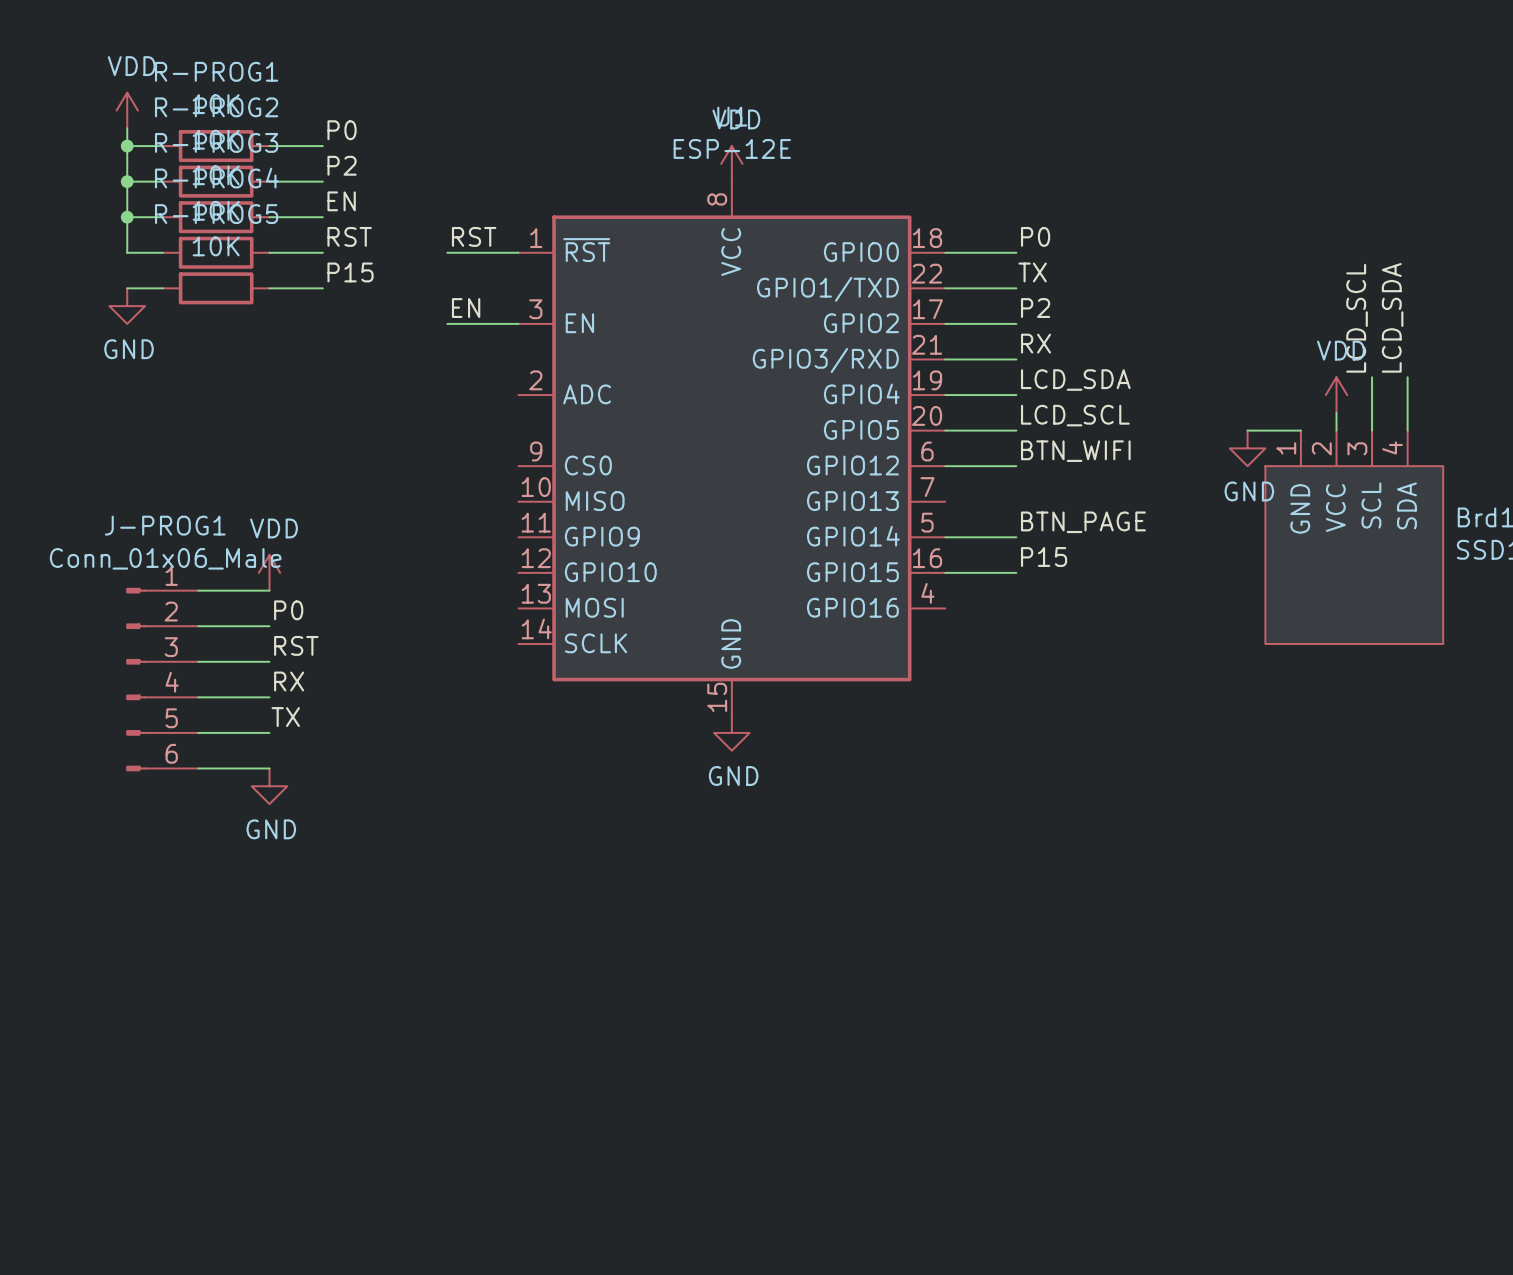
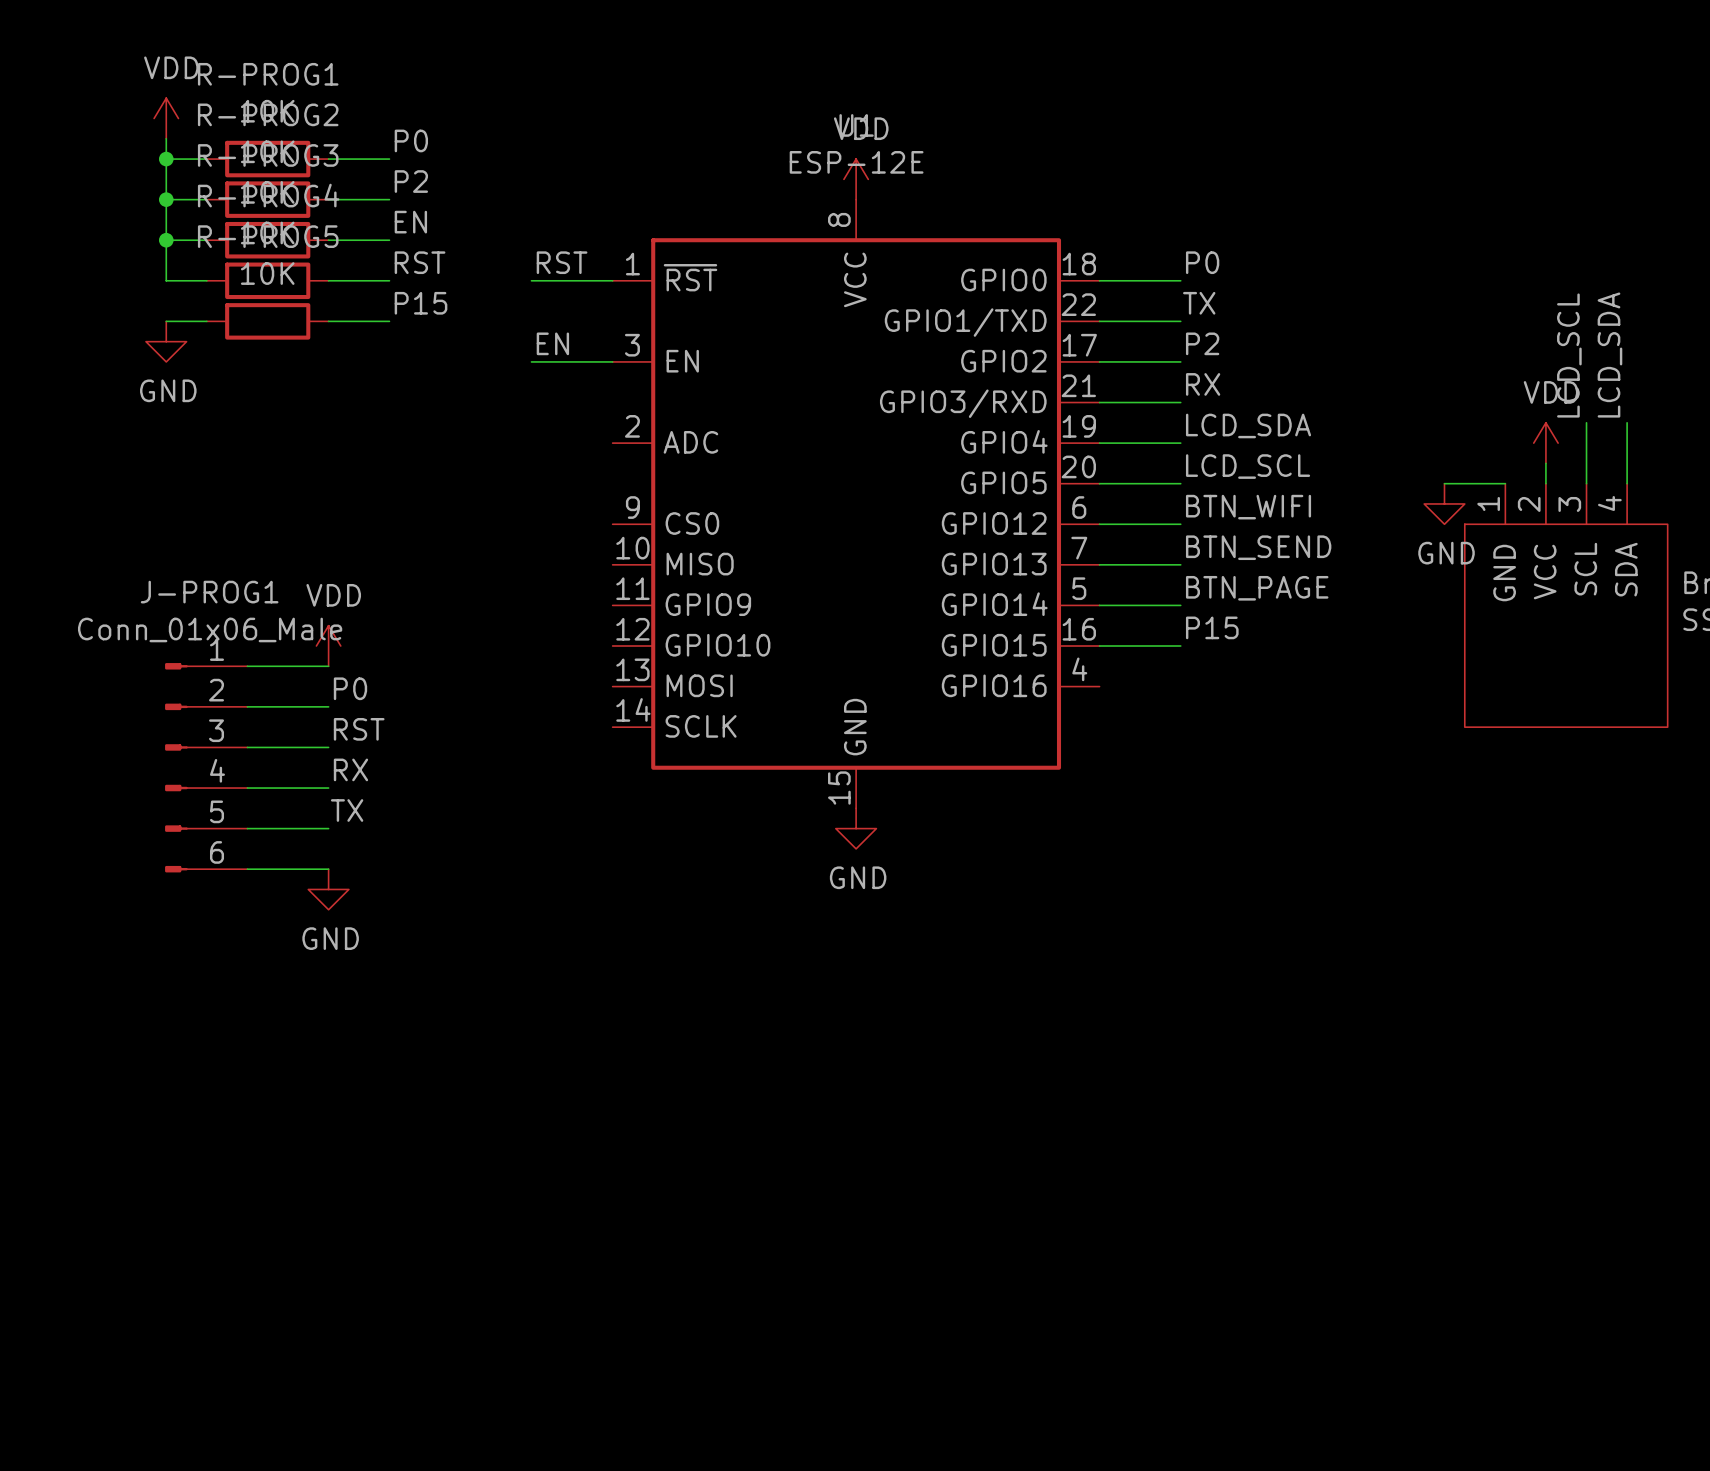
label: none -> BTN_SEND (1258, 547)
wire: none -> (1099, 564) (1180, 564)

